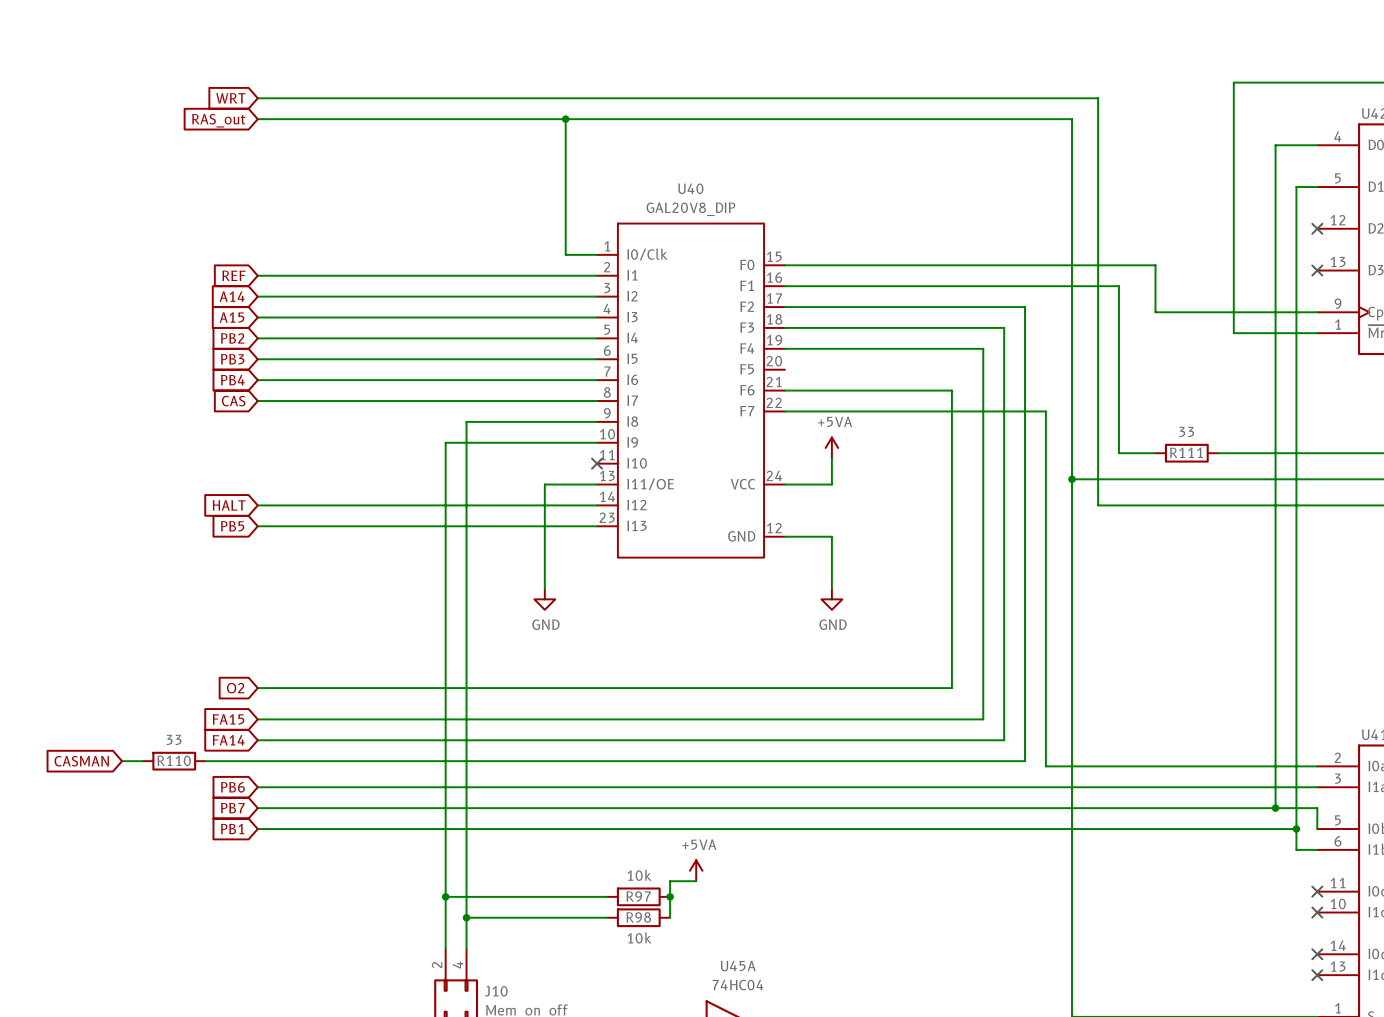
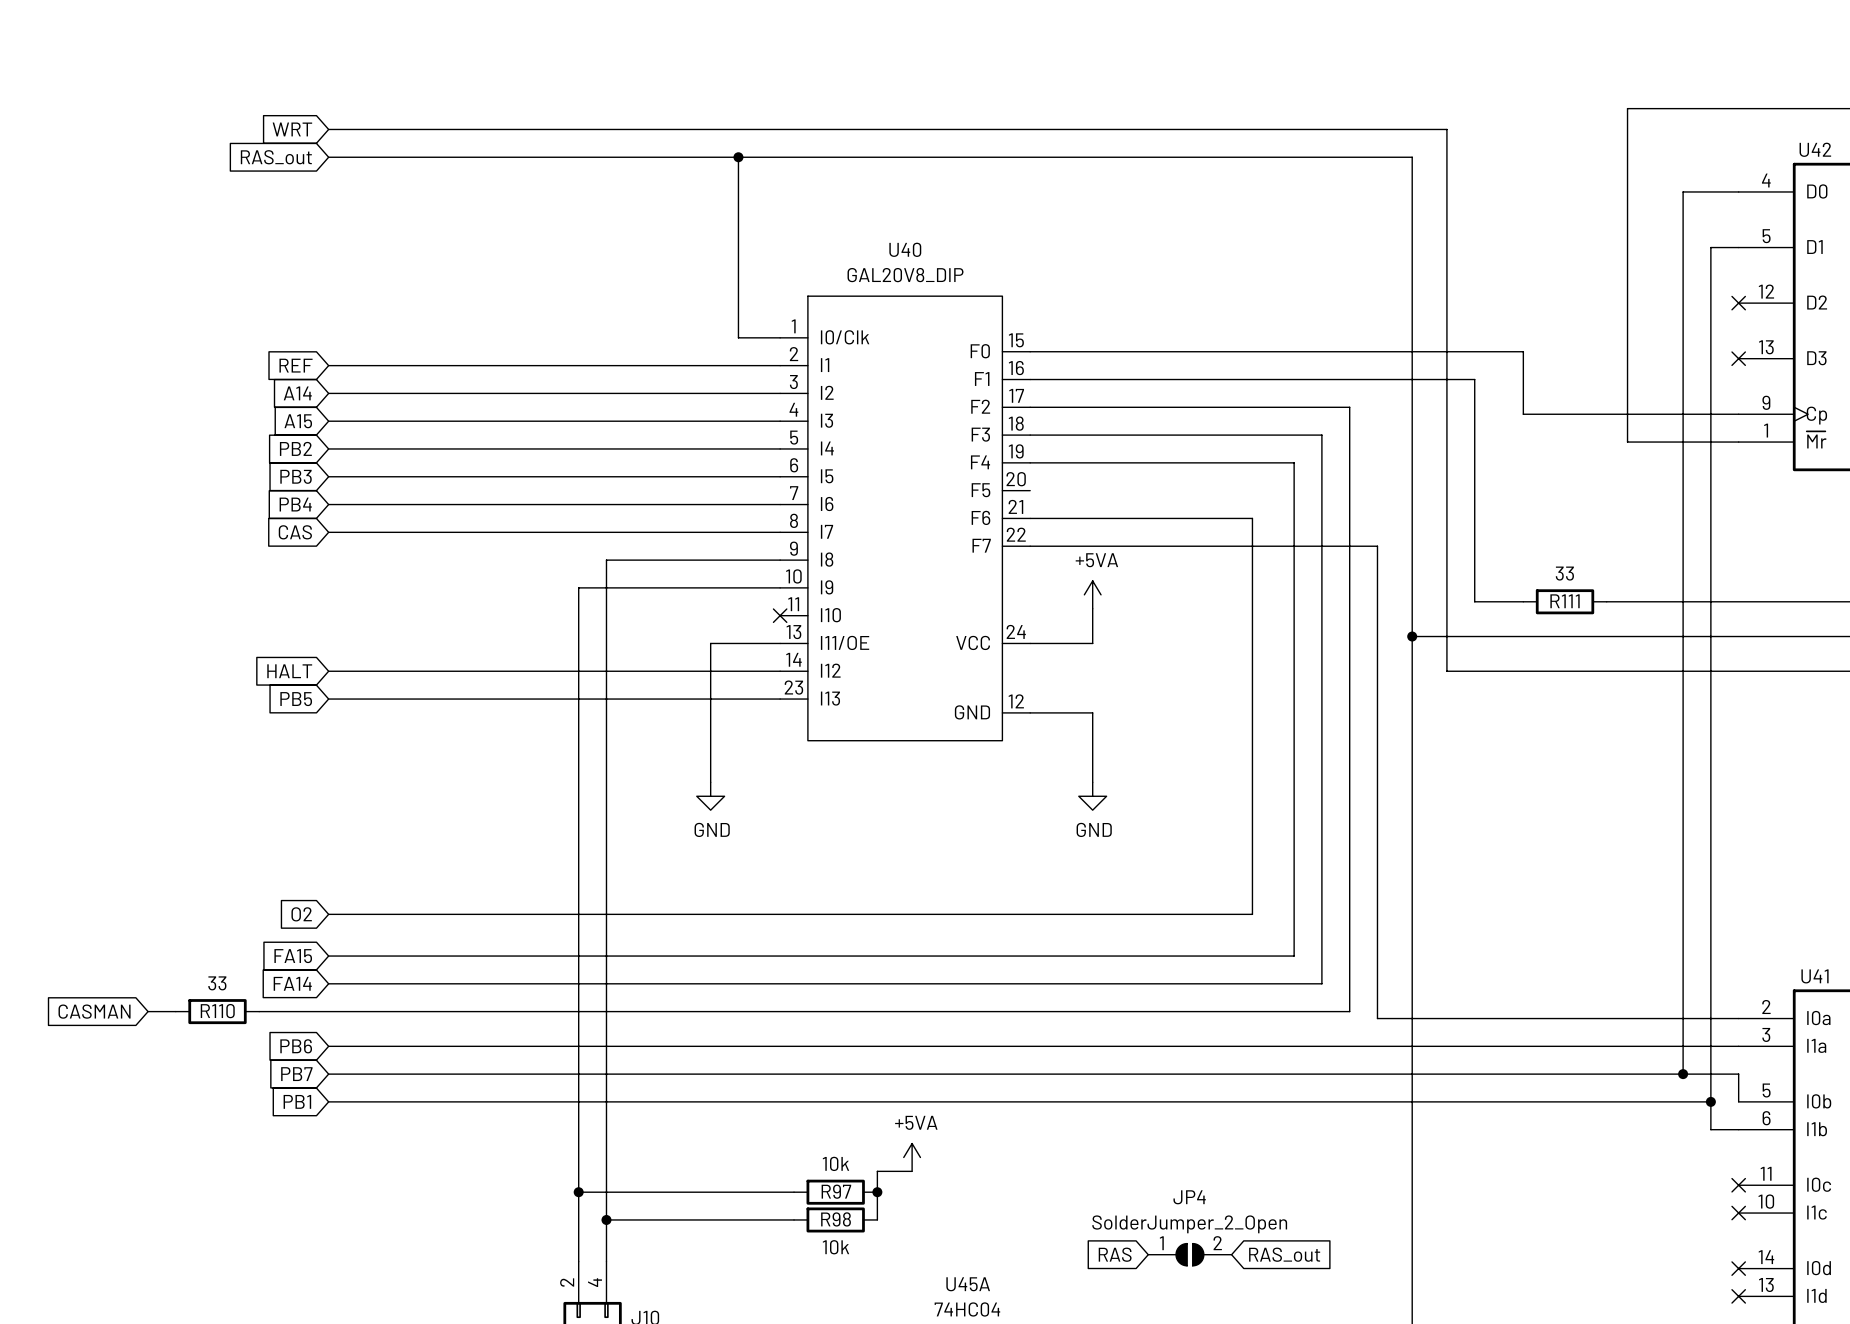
global label: none -> RAS (1115, 1254)
JP4: none -> SolderJumper_2_Open (1189, 1254)
global label: none -> RAS_out (1284, 1254)

